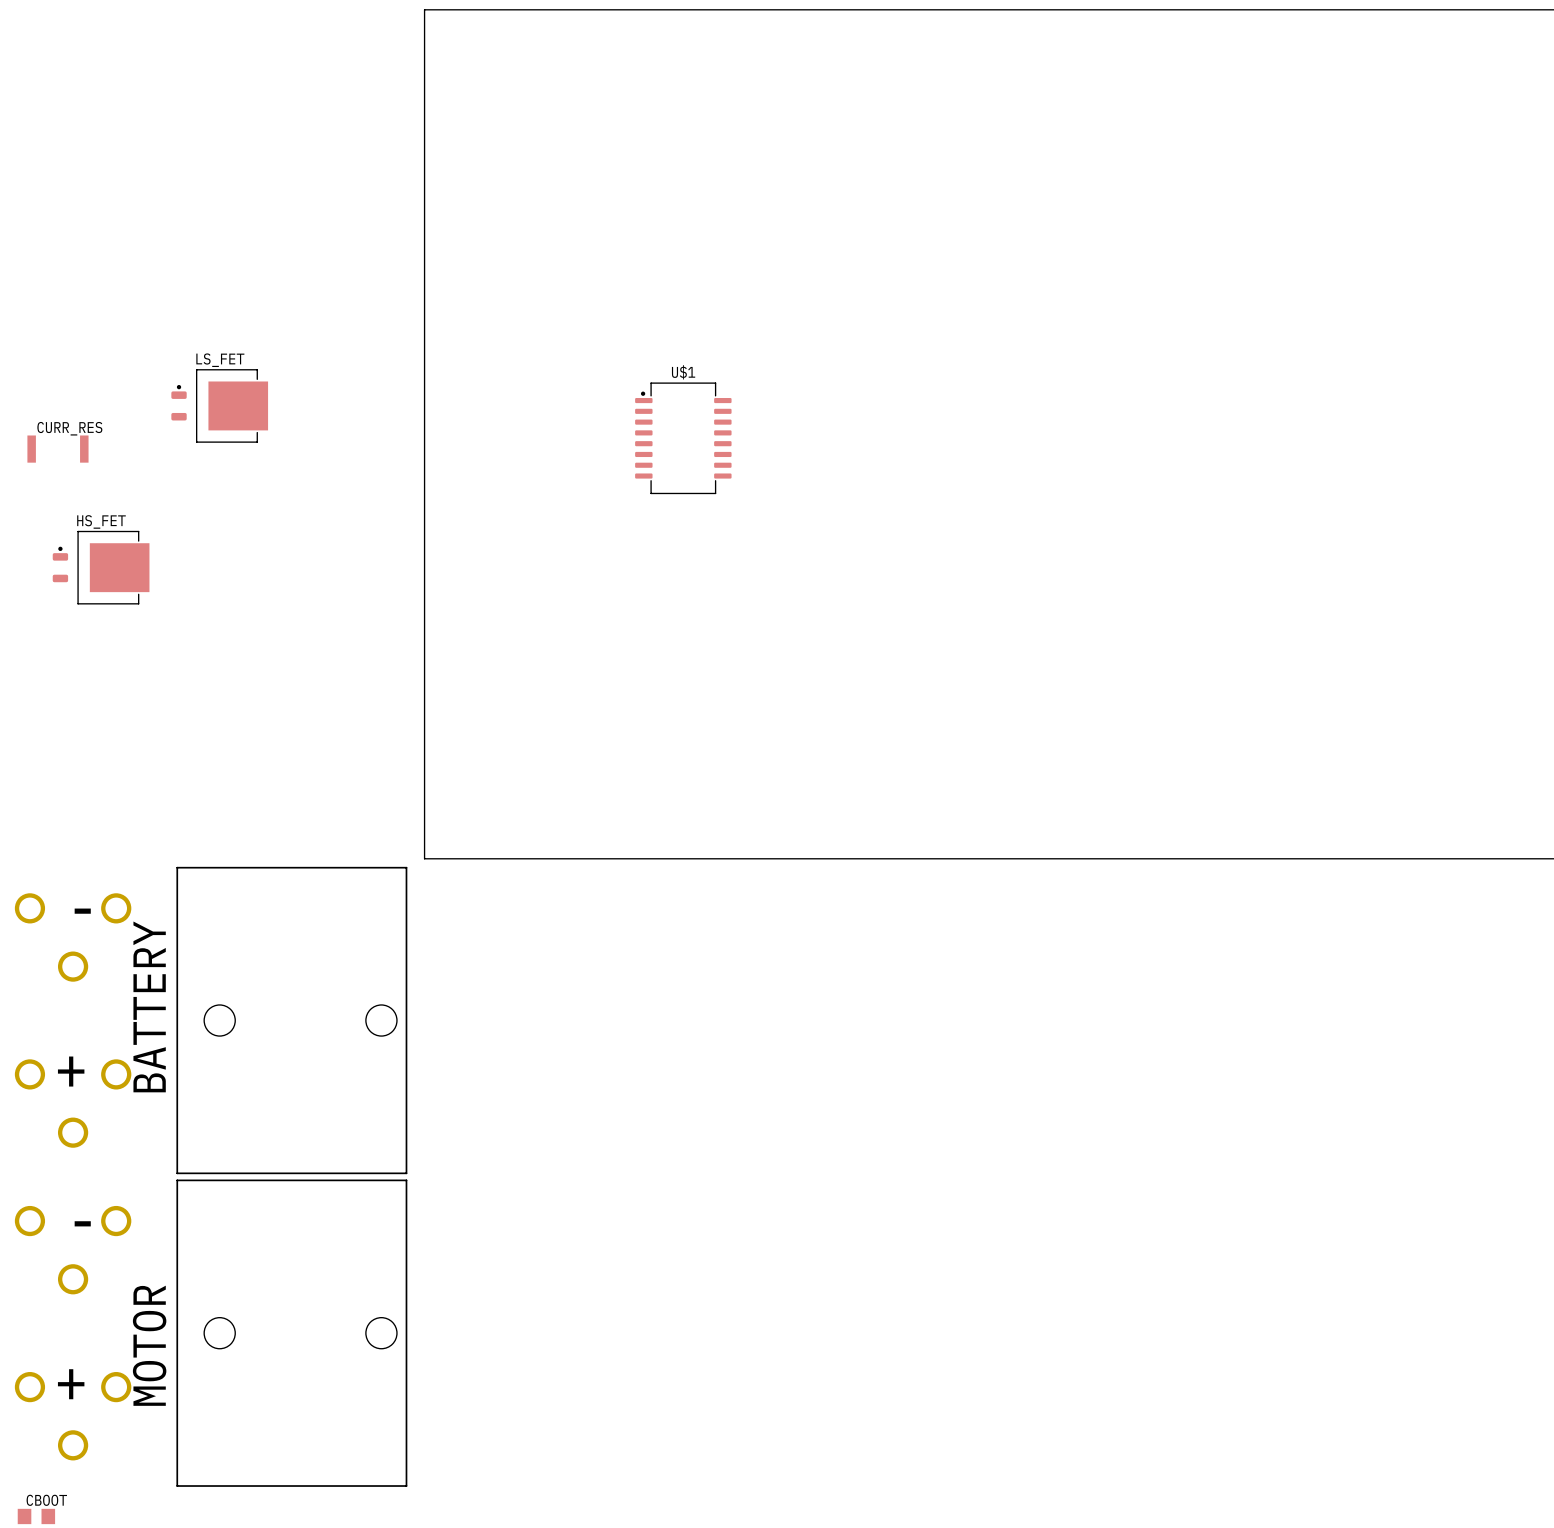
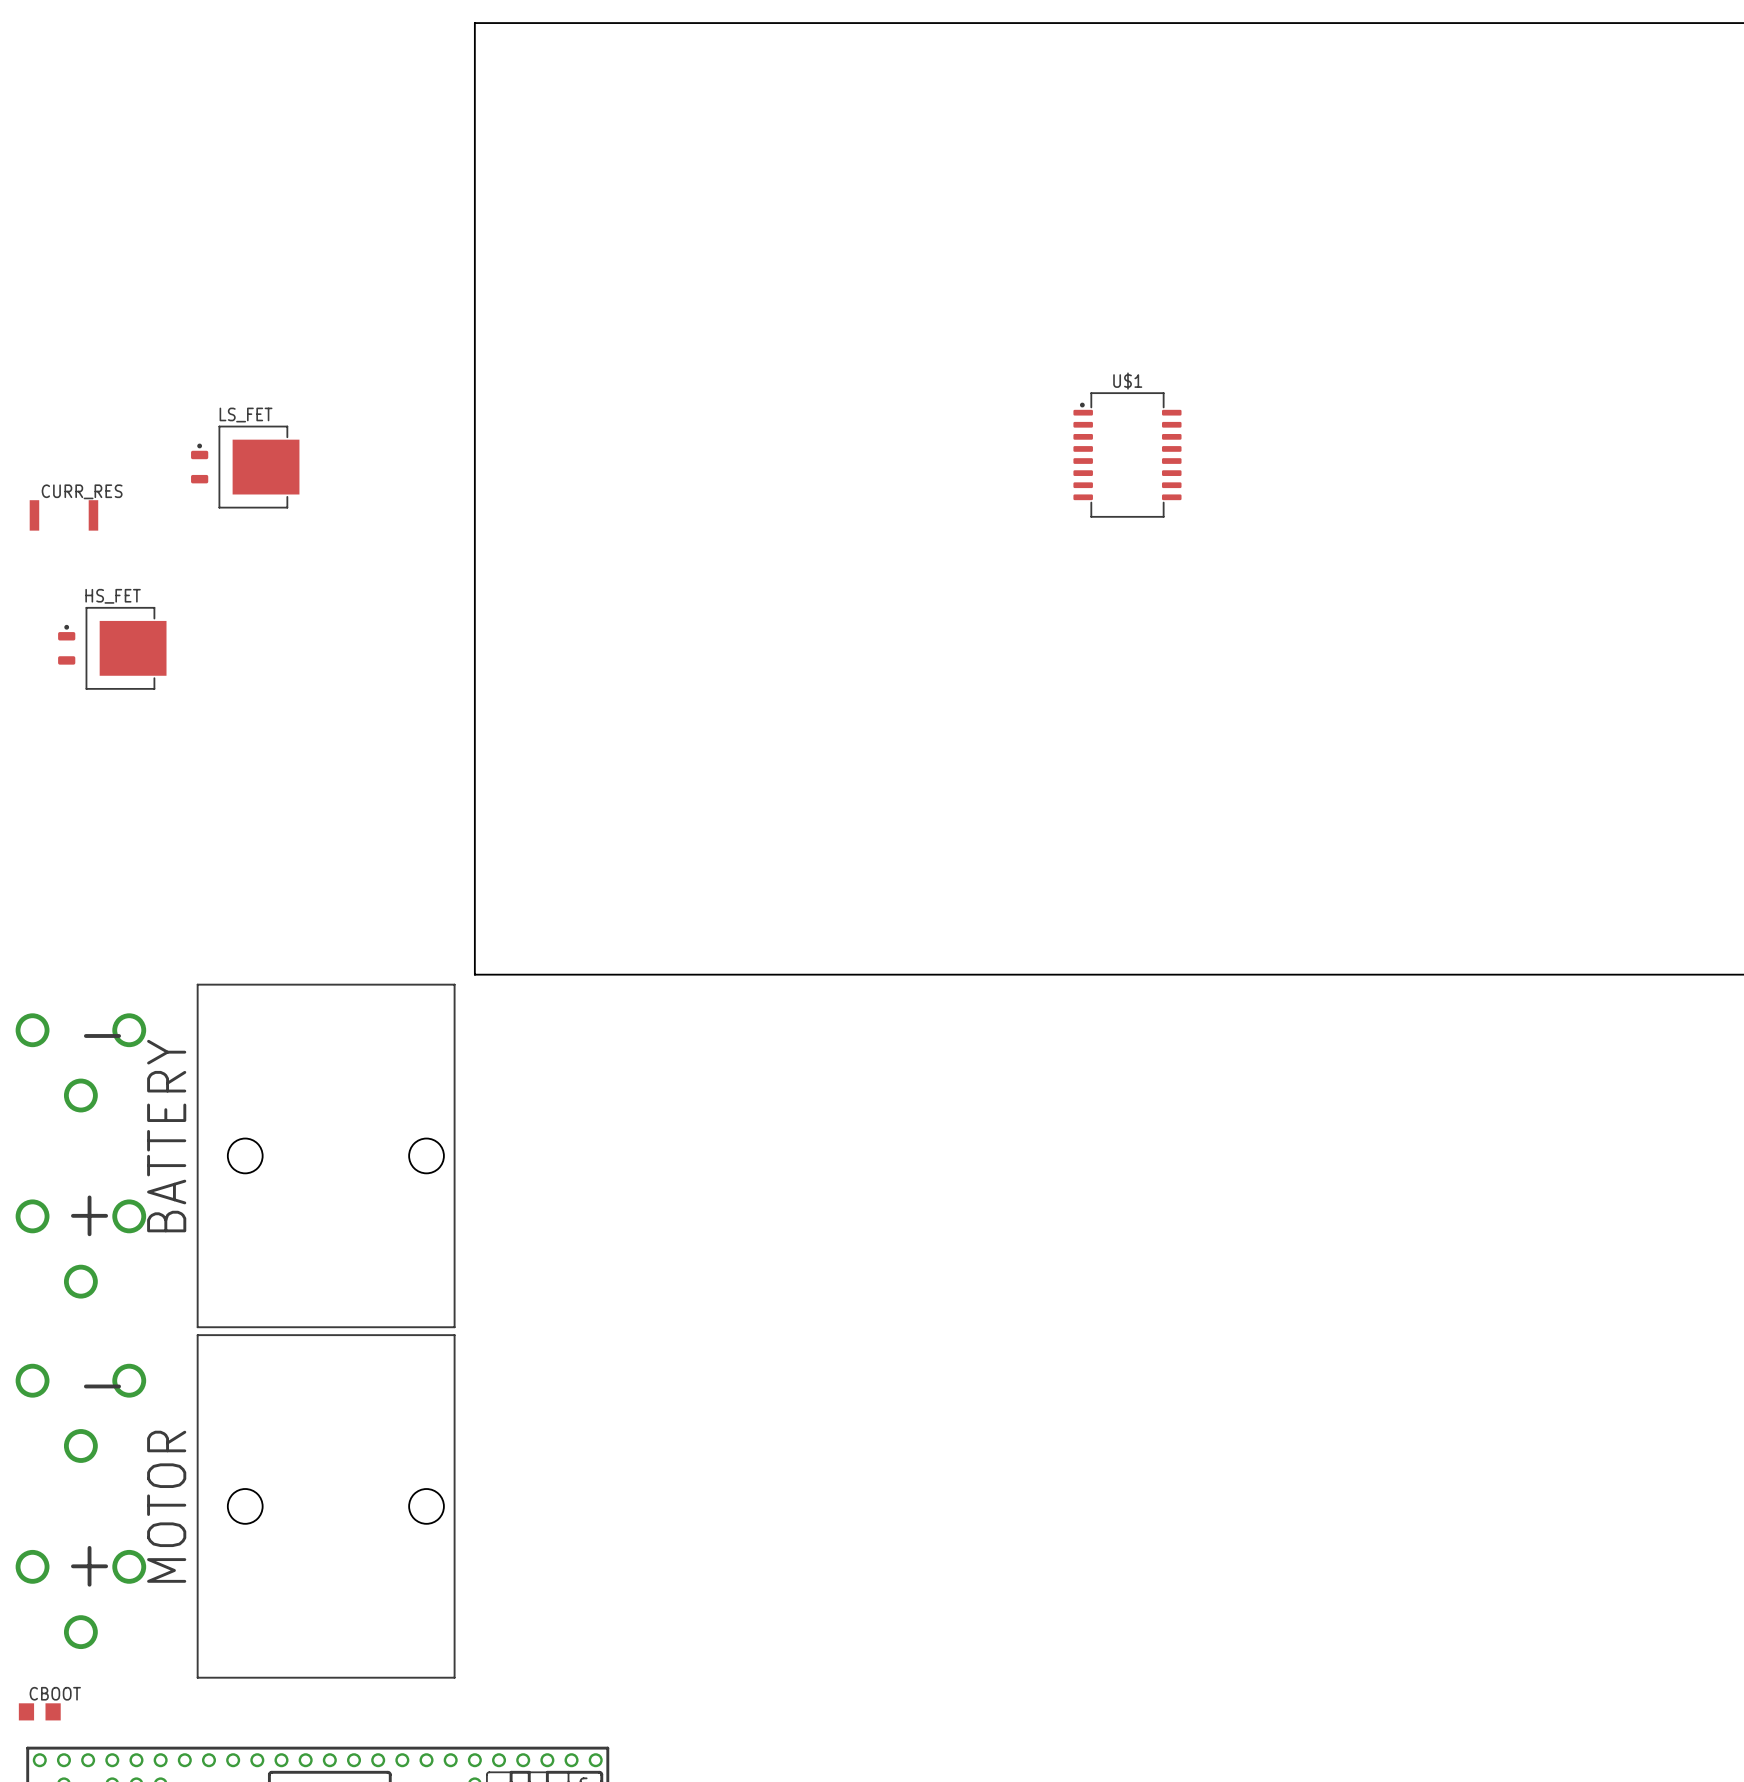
U$1 position: (683, 438) -> (1127, 454)

